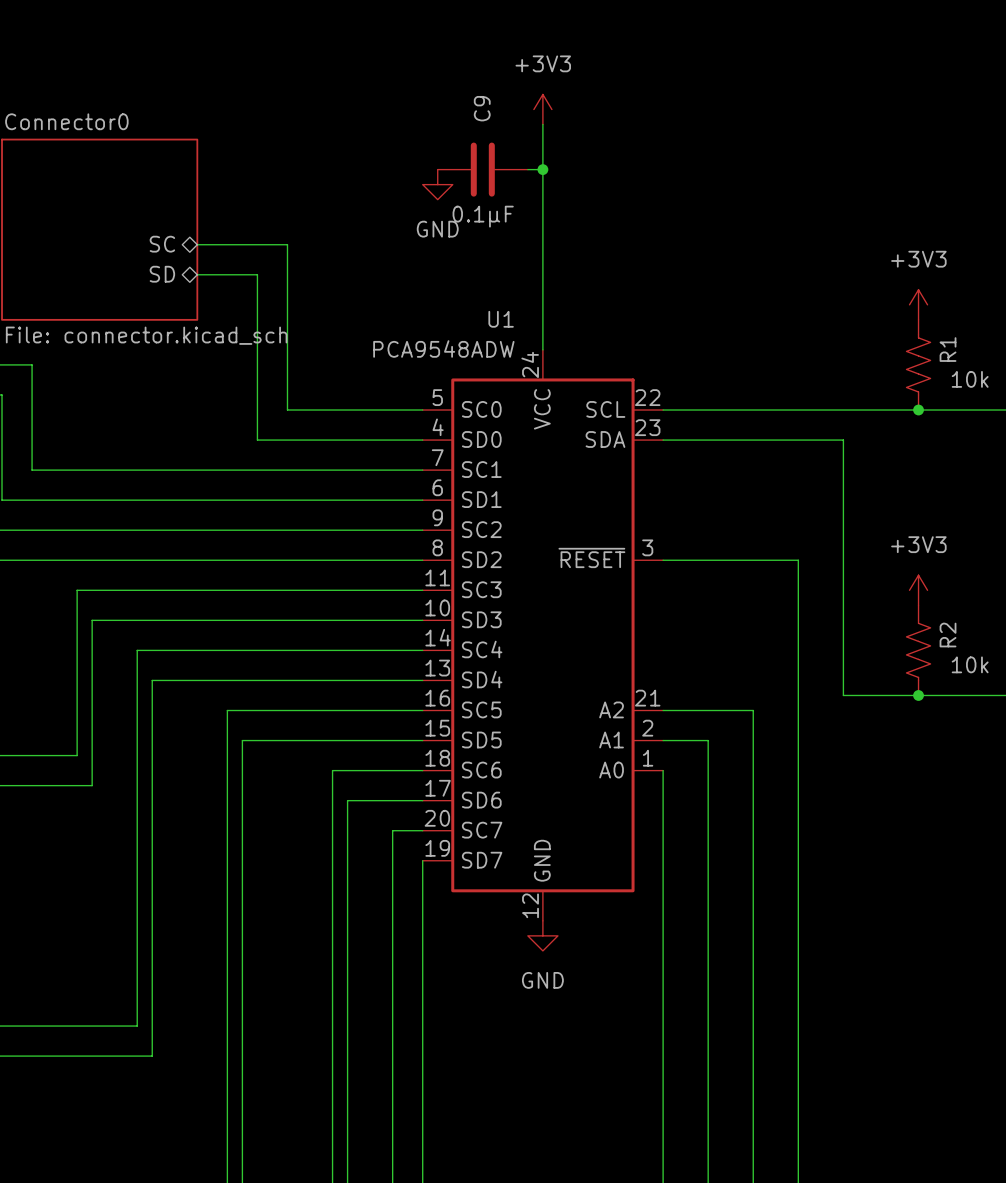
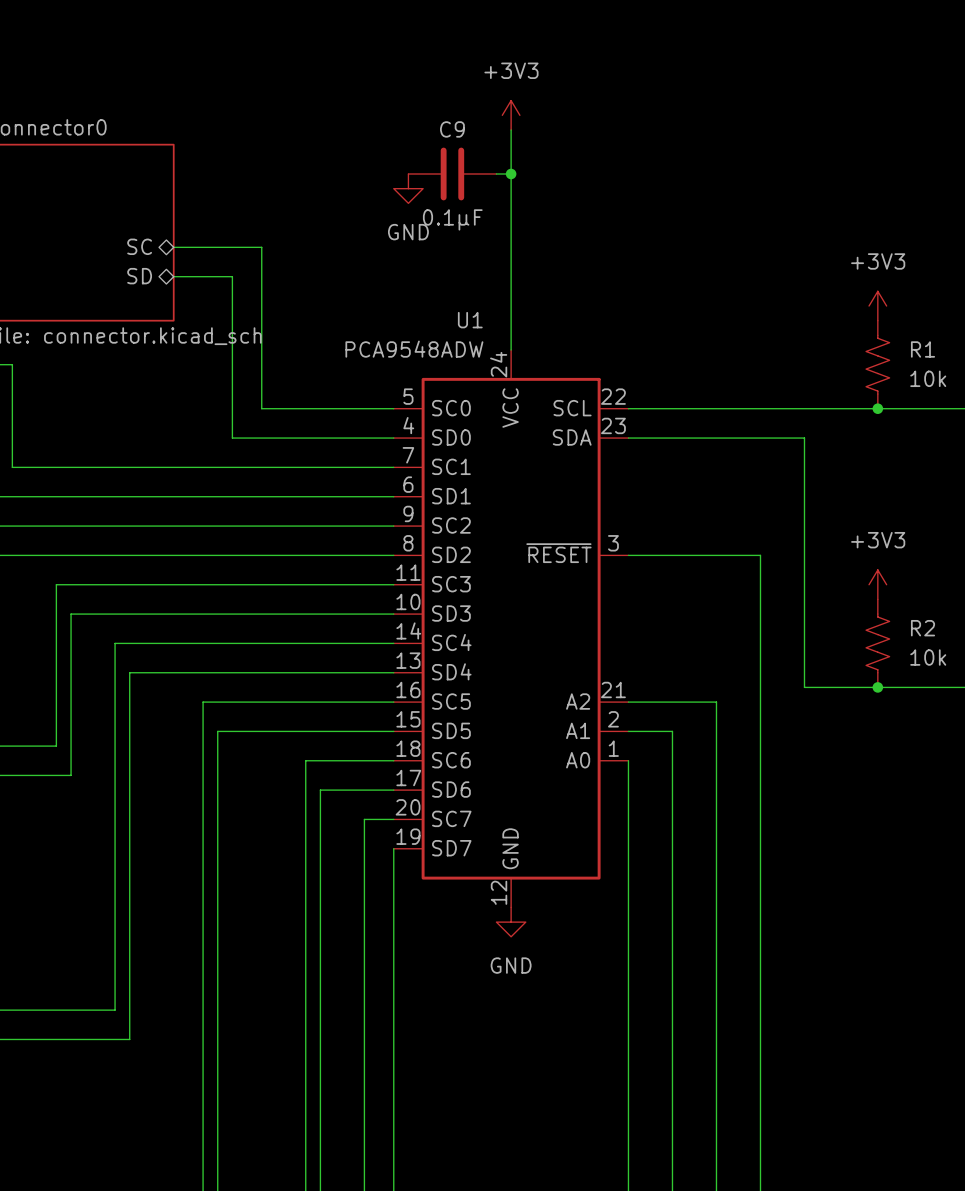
C9 name rotation: 0° (482, 108) -> 90° clockwise (452, 129)
R1 name rotation: 0° (948, 349) -> 90° clockwise (923, 349)
R2 name rotation: 0° (948, 635) -> 90° clockwise (923, 628)

